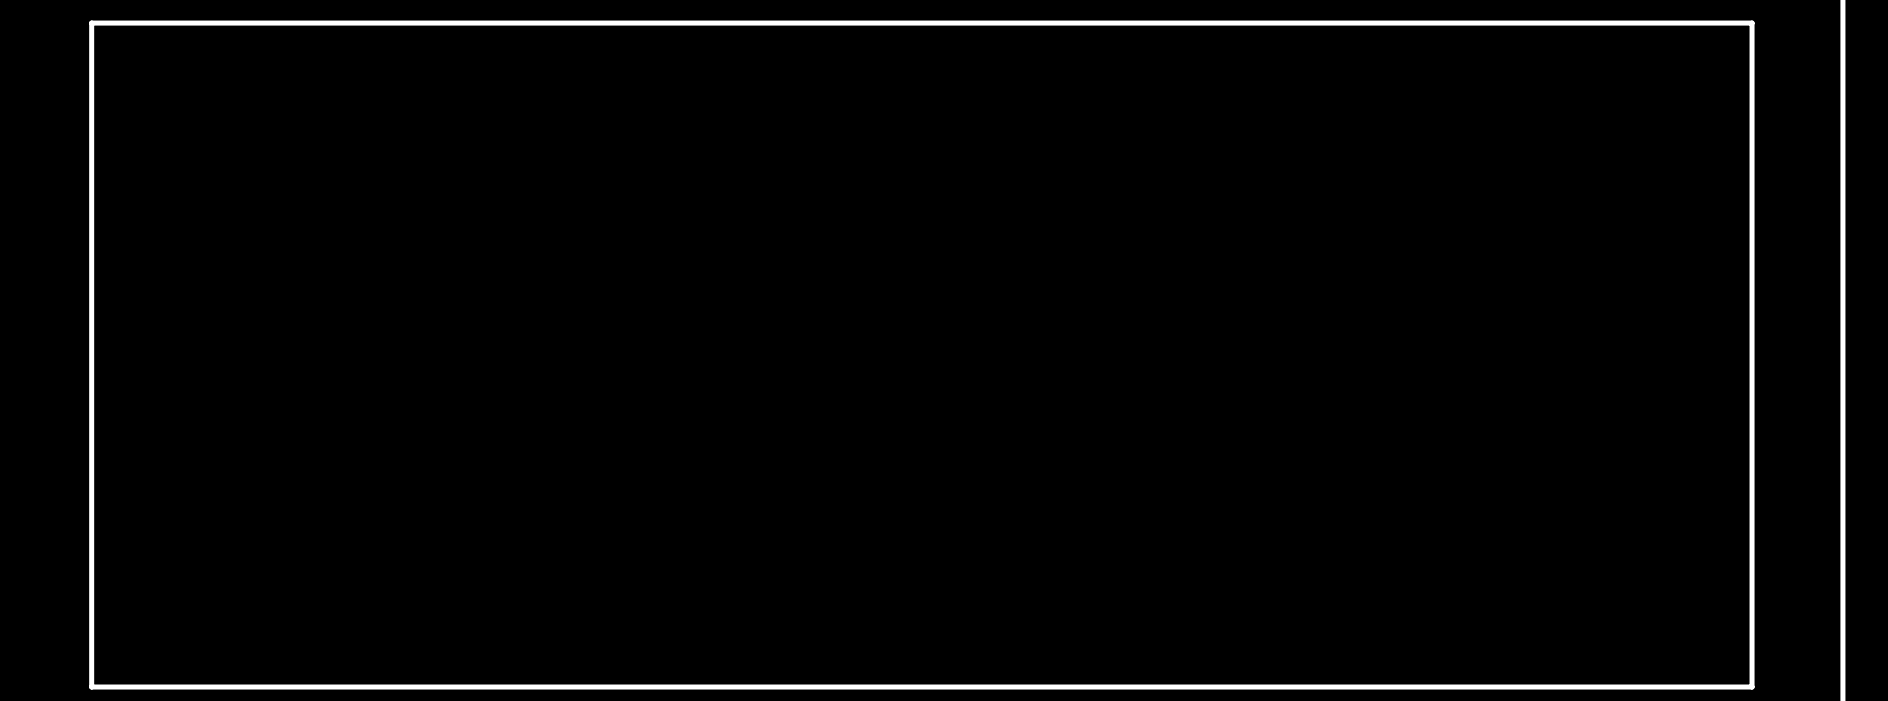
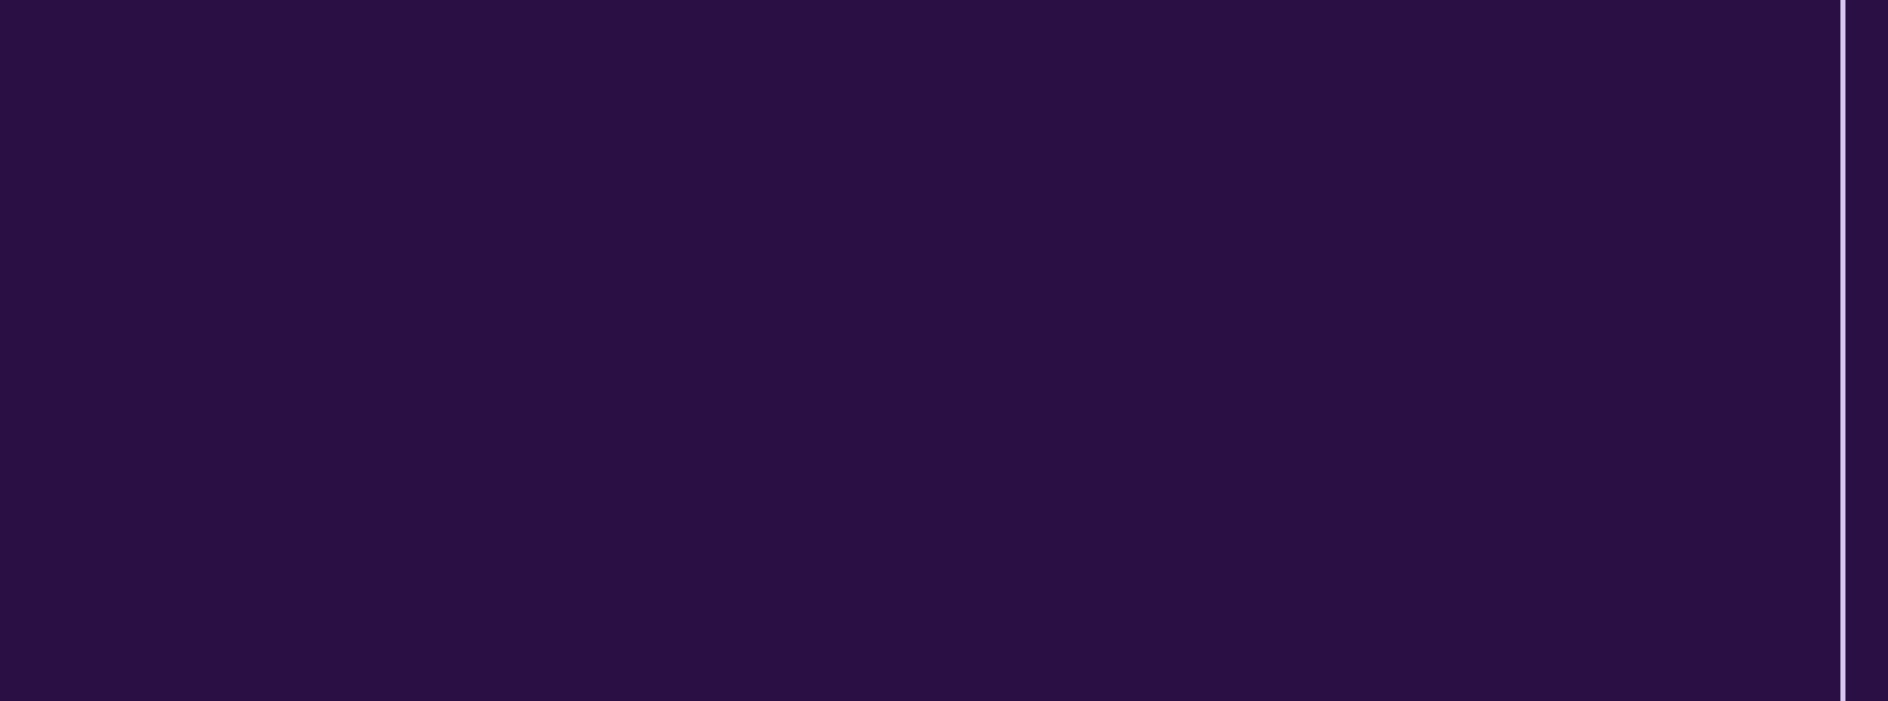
board edge: (1752, 23) (91, 23) (91, 687) (1752, 687) (1752, 23) -> none

